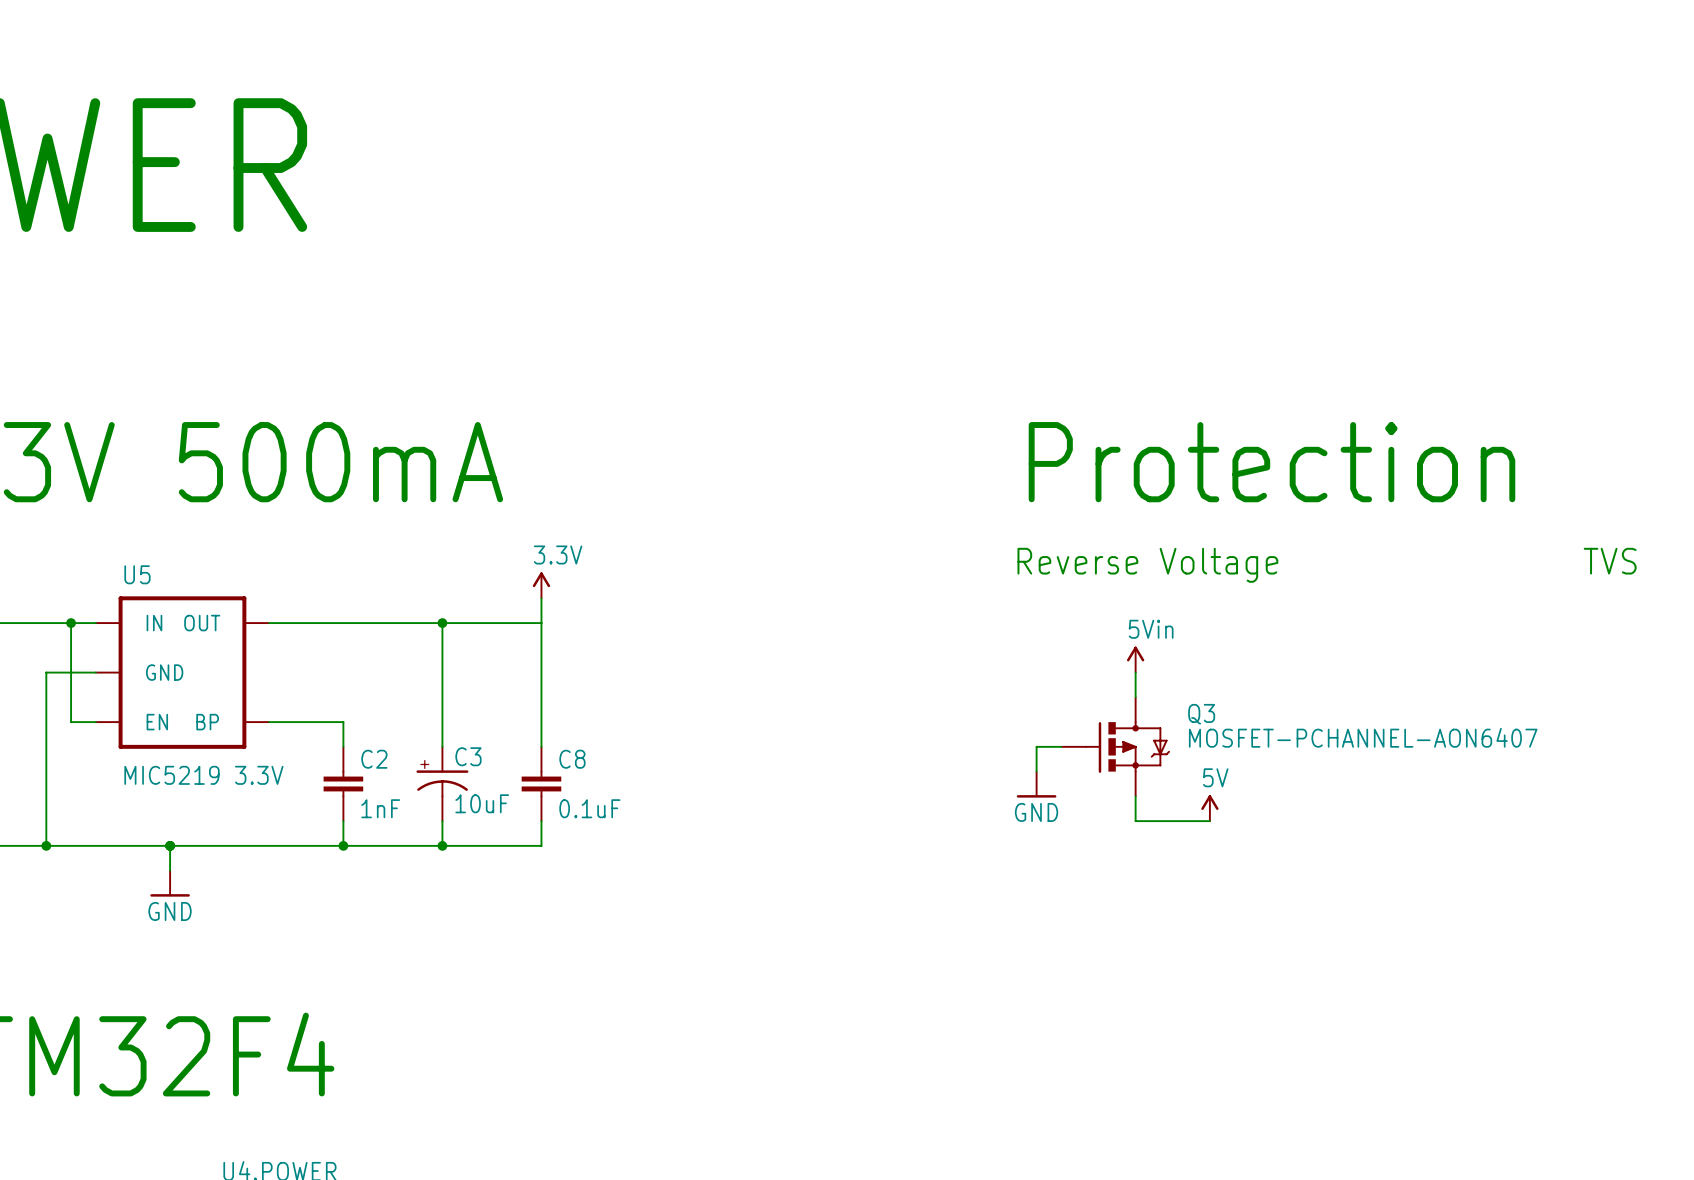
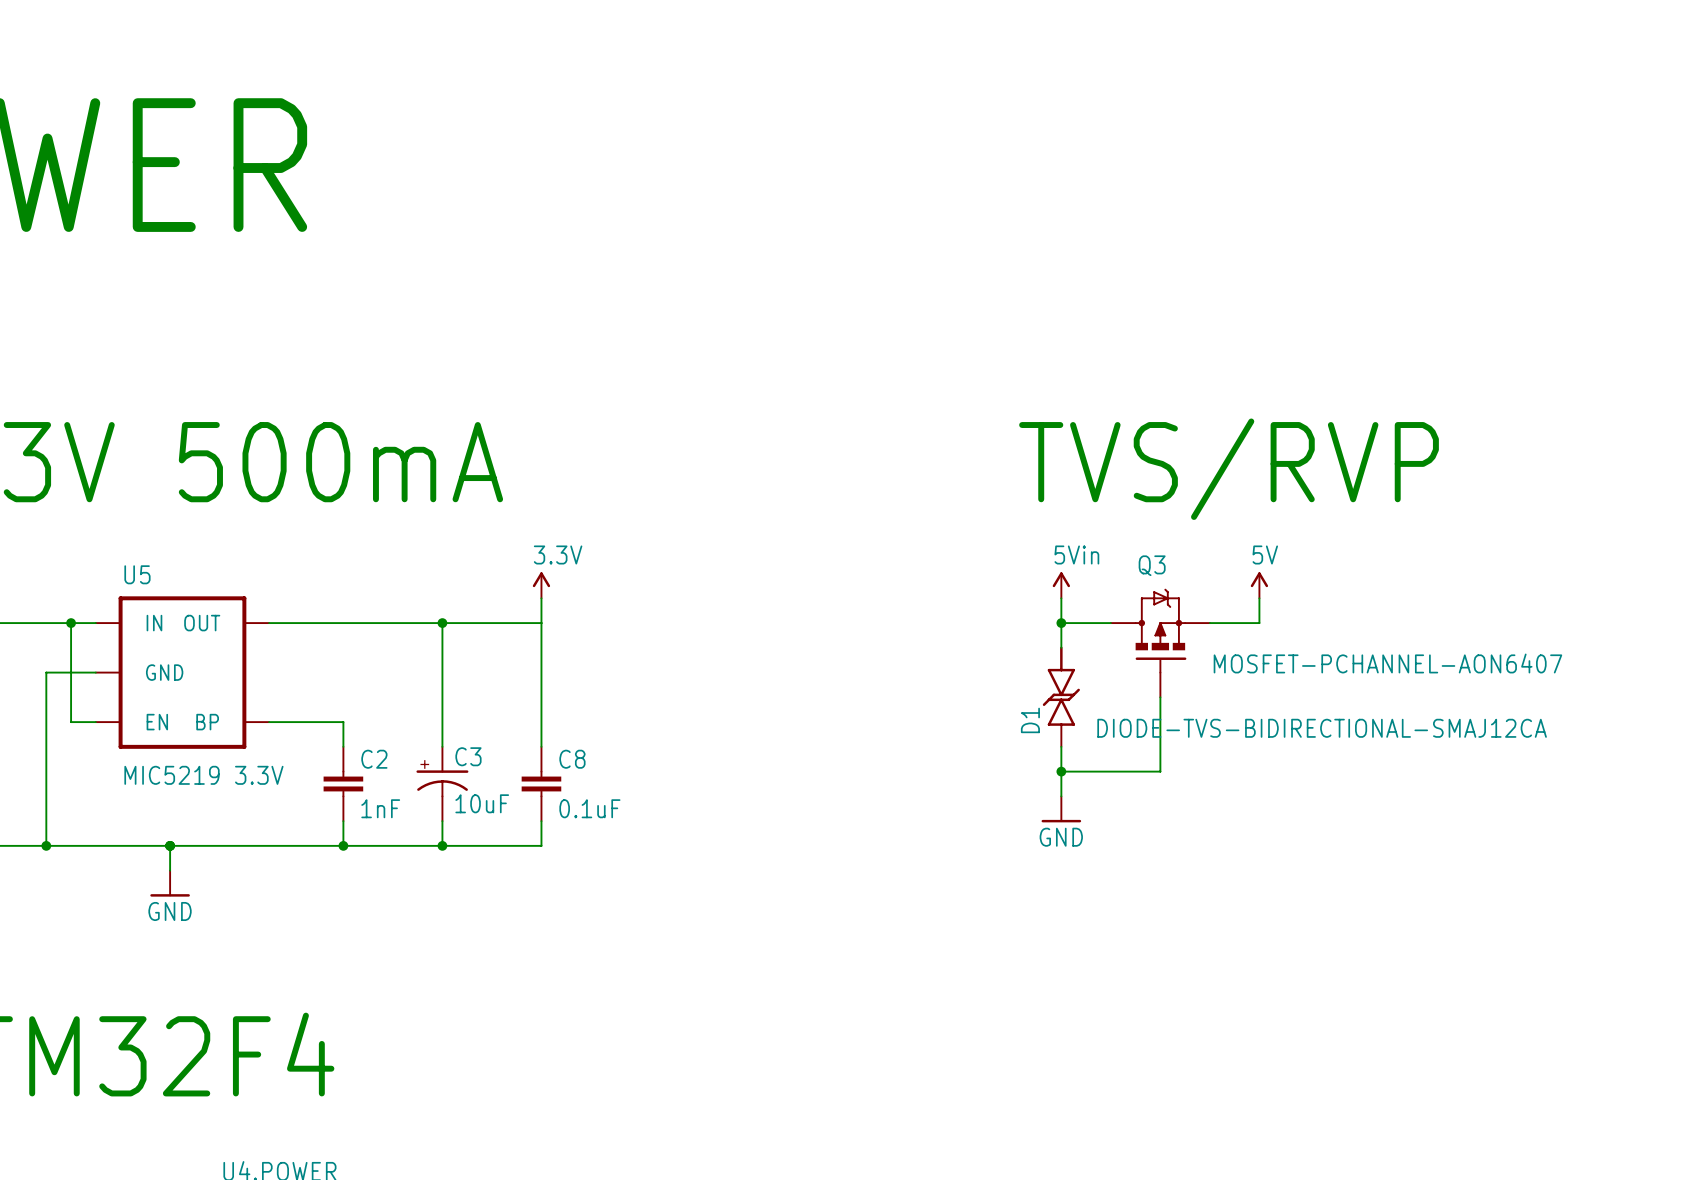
text: Protection (1271, 462) -> TVS/RVP (1229, 469)
text: TVS (1610, 561) -> none
text: Reverse Voltage (1147, 565) -> none
wire: none -> (1061, 598) (1061, 647)
wire: none -> (1259, 598) (1259, 623) (1209, 623)
wire: none -> (1061, 623) (1110, 623)
junction: none -> (1061, 623)
power symbol position: 5Vin (1135, 659) -> 5Vin (1061, 585)
wire: (1135, 672) (1135, 697) -> none
D1: none -> DIODE-TVS-BIDIRECTIONAL-SMAJ12CA (1061, 697)
wire: none -> (1160, 697) (1160, 771) (1061, 771)
Q3 name position: Q3 (1201, 714) -> Q3 (1152, 565)
Q3 value position: MOSFET-PCHANNEL-AON6407 (1363, 737) -> MOSFET-PCHANNEL-AON6407 (1387, 663)
wire: (1061, 746) (1036, 746) (1036, 771) -> (1061, 746) (1061, 796)
Q3 position: (1115, 746) -> (1160, 643)
Q3 rotation: 0° (1127, 747) -> 90° counterclockwise (1160, 631)
junction: none -> (1061, 771)
power symbol position: GND (1036, 784) -> GND (1061, 809)
wire: (1135, 796) (1135, 821) (1209, 821) -> none
power symbol position: 5V (1209, 808) -> 5V (1259, 585)

